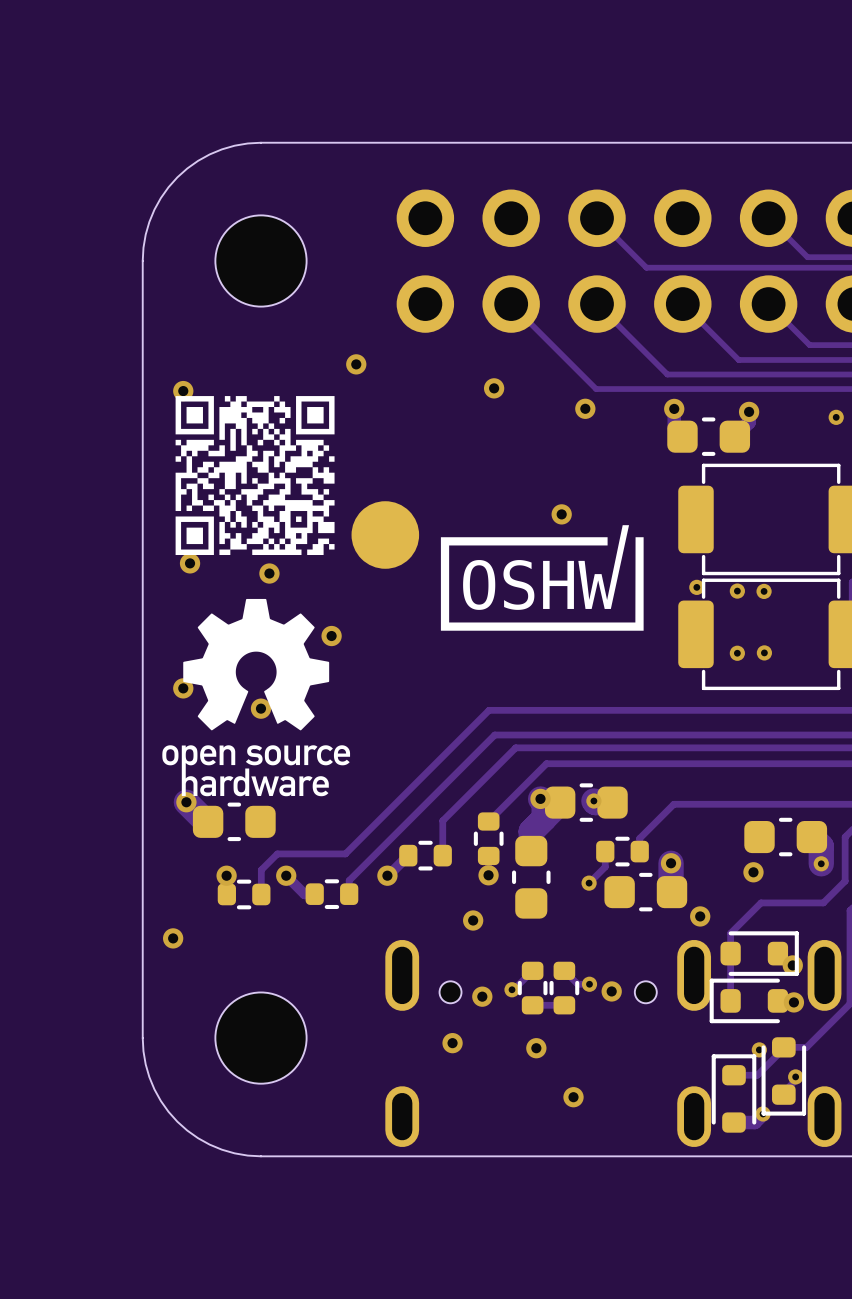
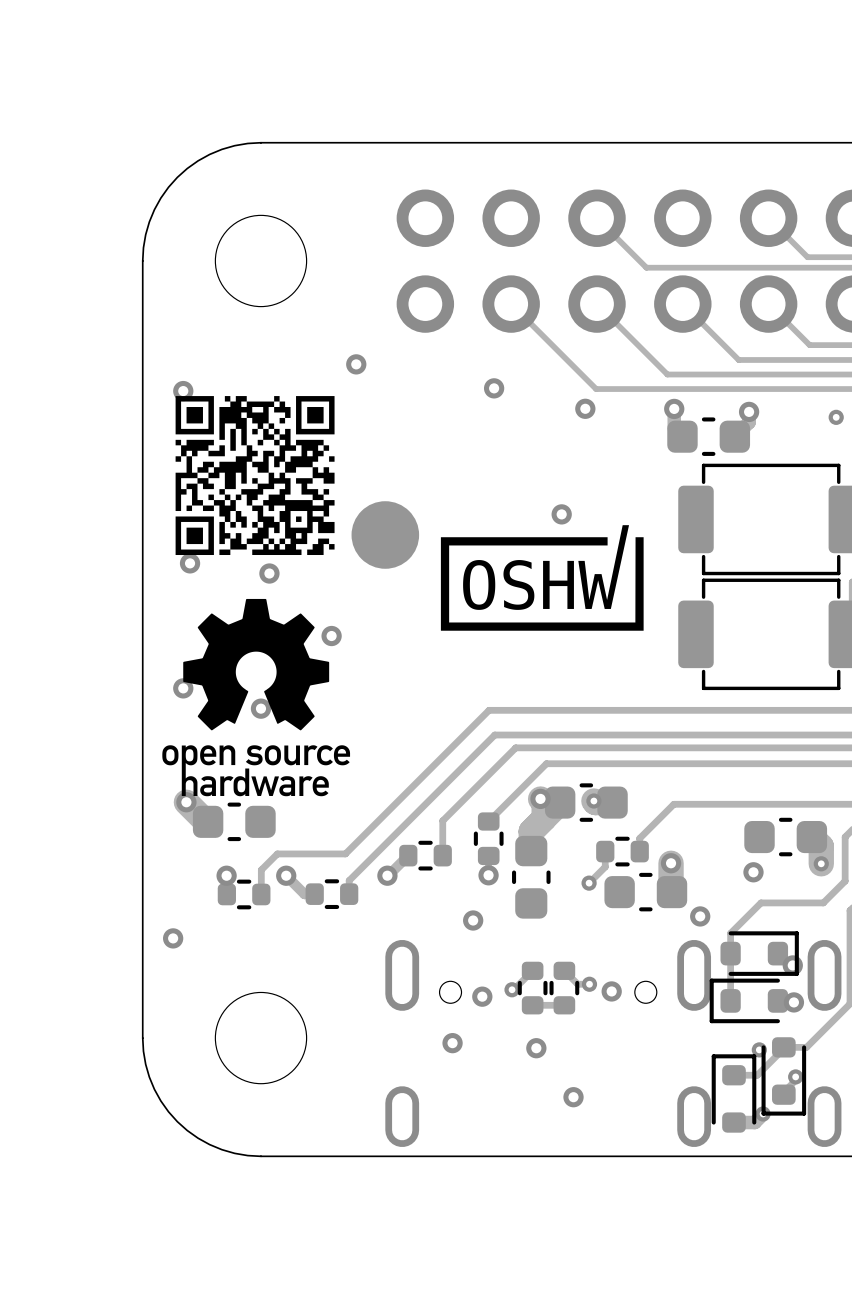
via: (696, 587) -> none
via: (737, 591) -> none
via: (764, 591) -> none
via: (764, 652) -> none
via: (737, 653) -> none

